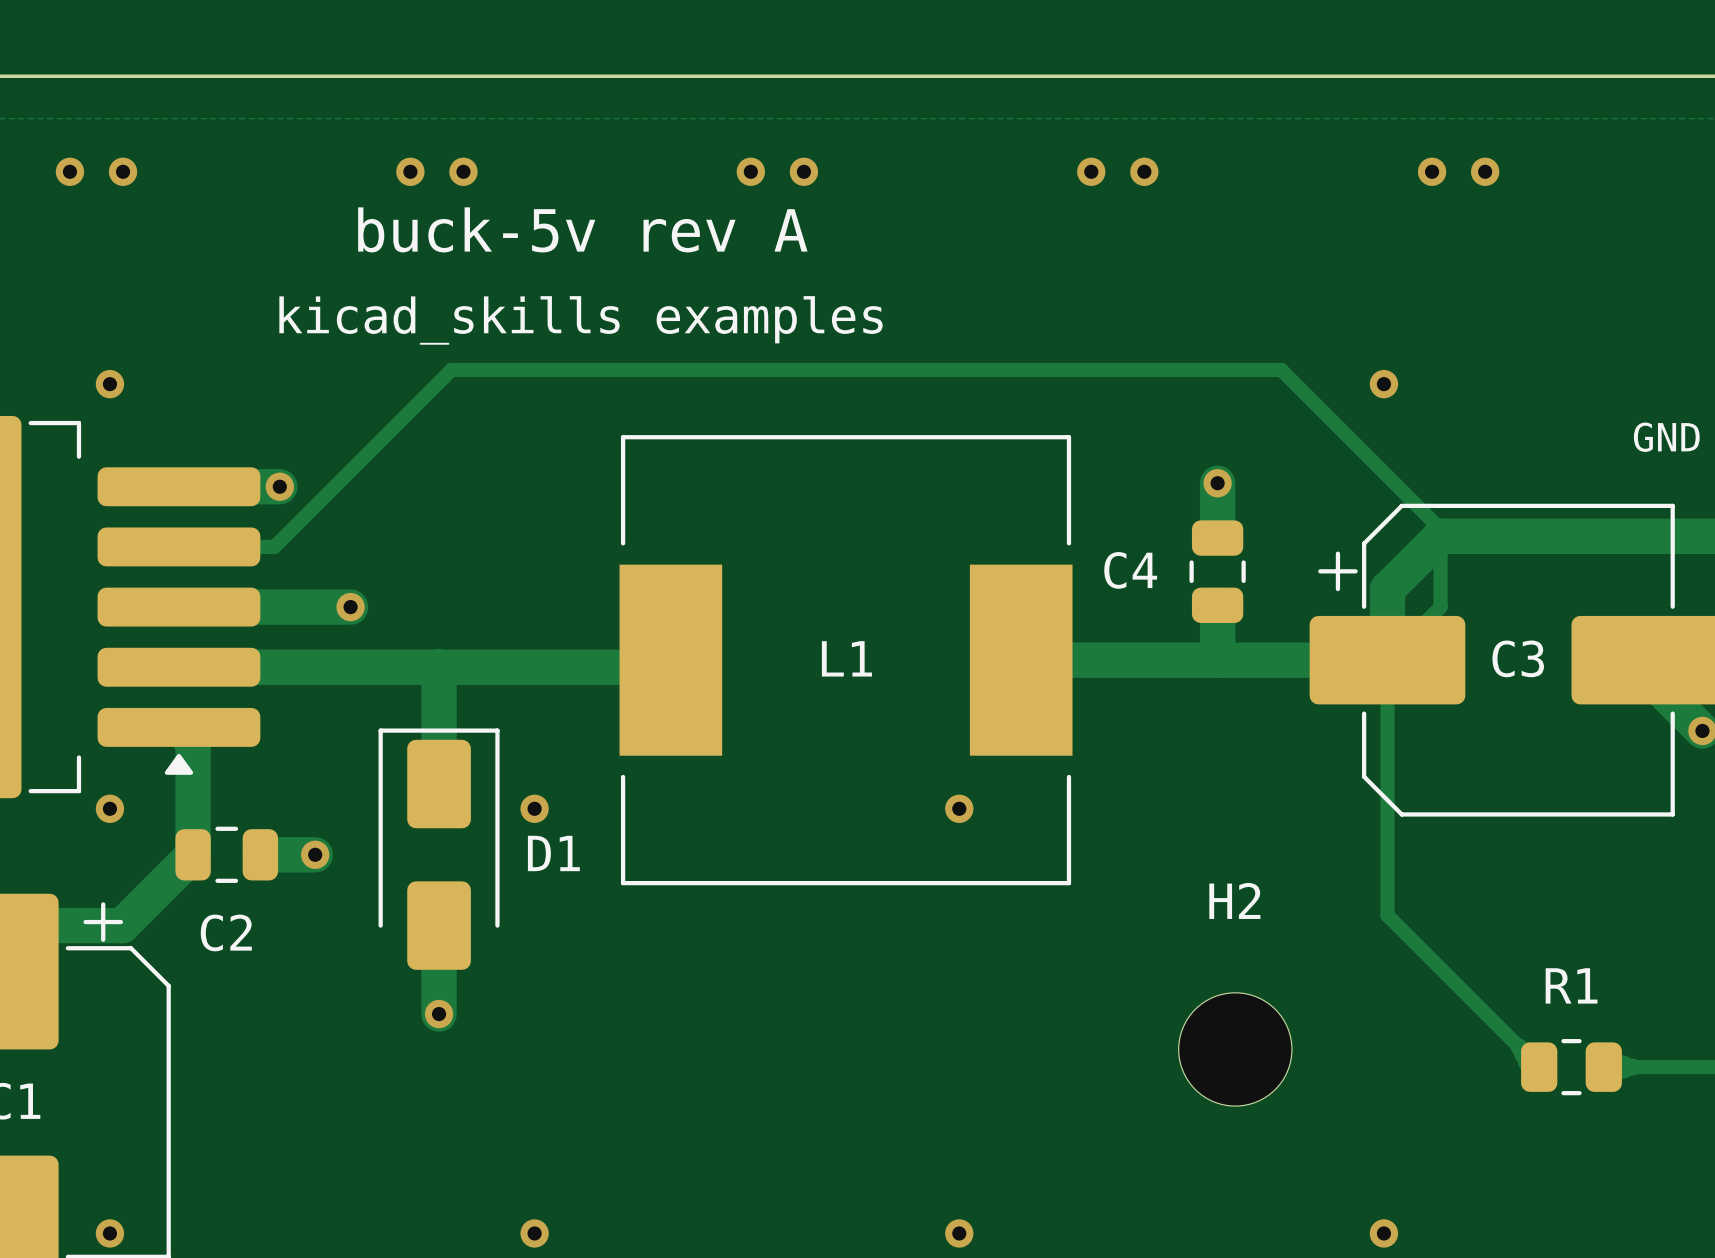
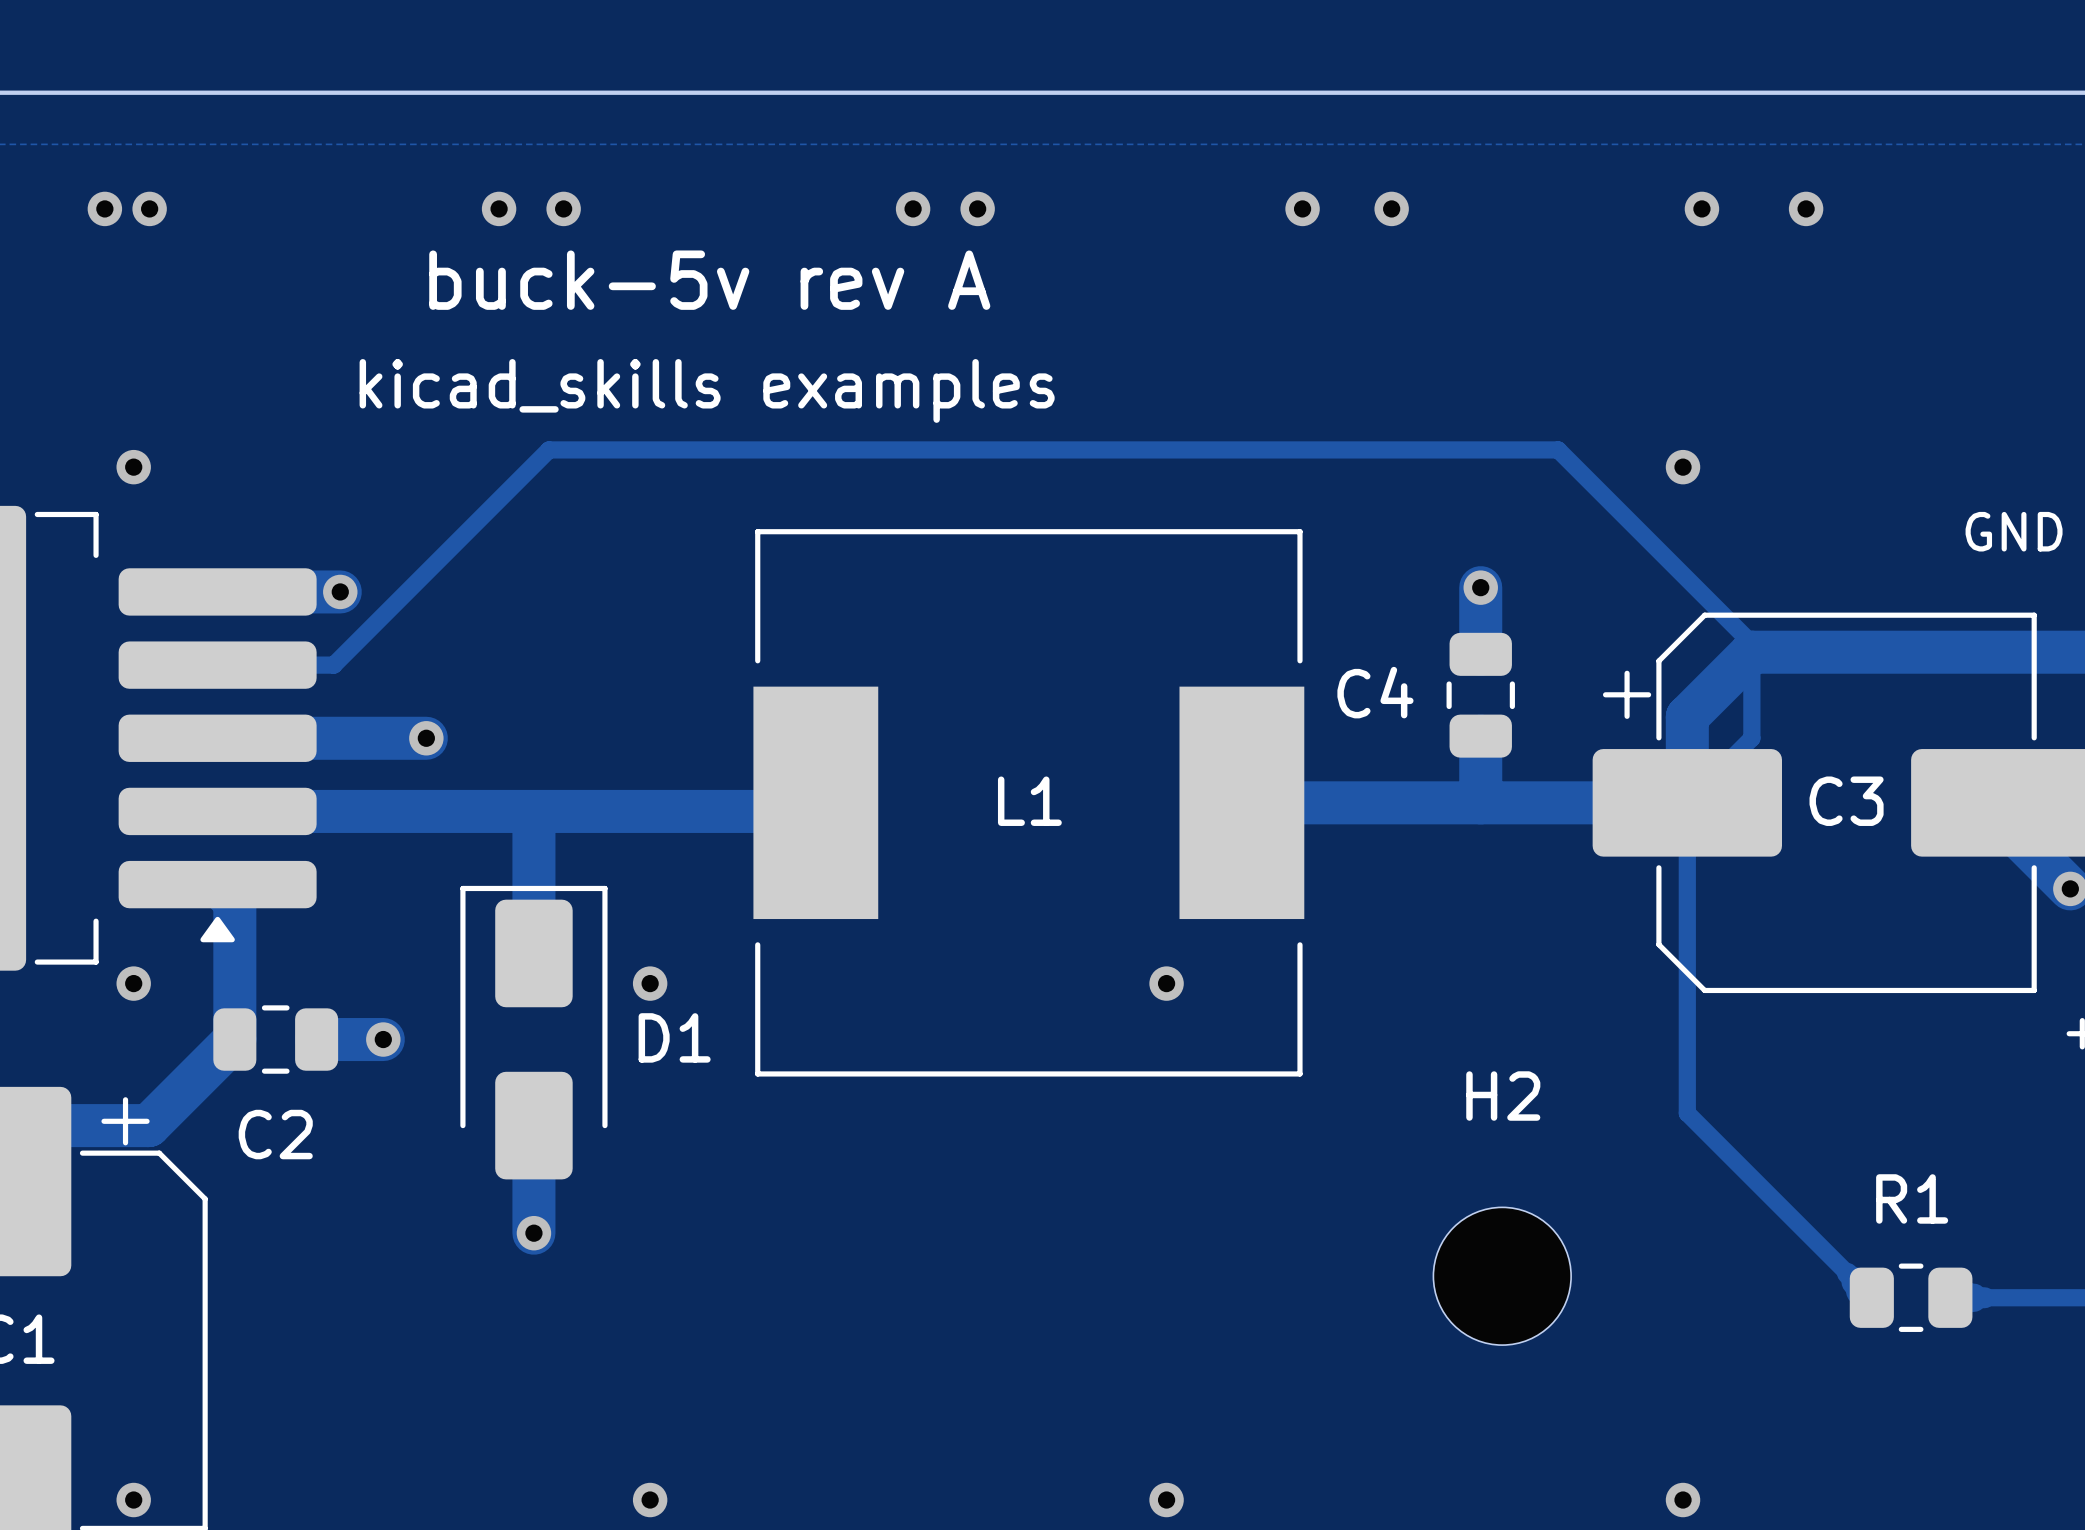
via position: (69, 171) -> (104, 208)
via position: (1091, 171) -> (1302, 208)
via position: (1432, 171) -> (1701, 208)

